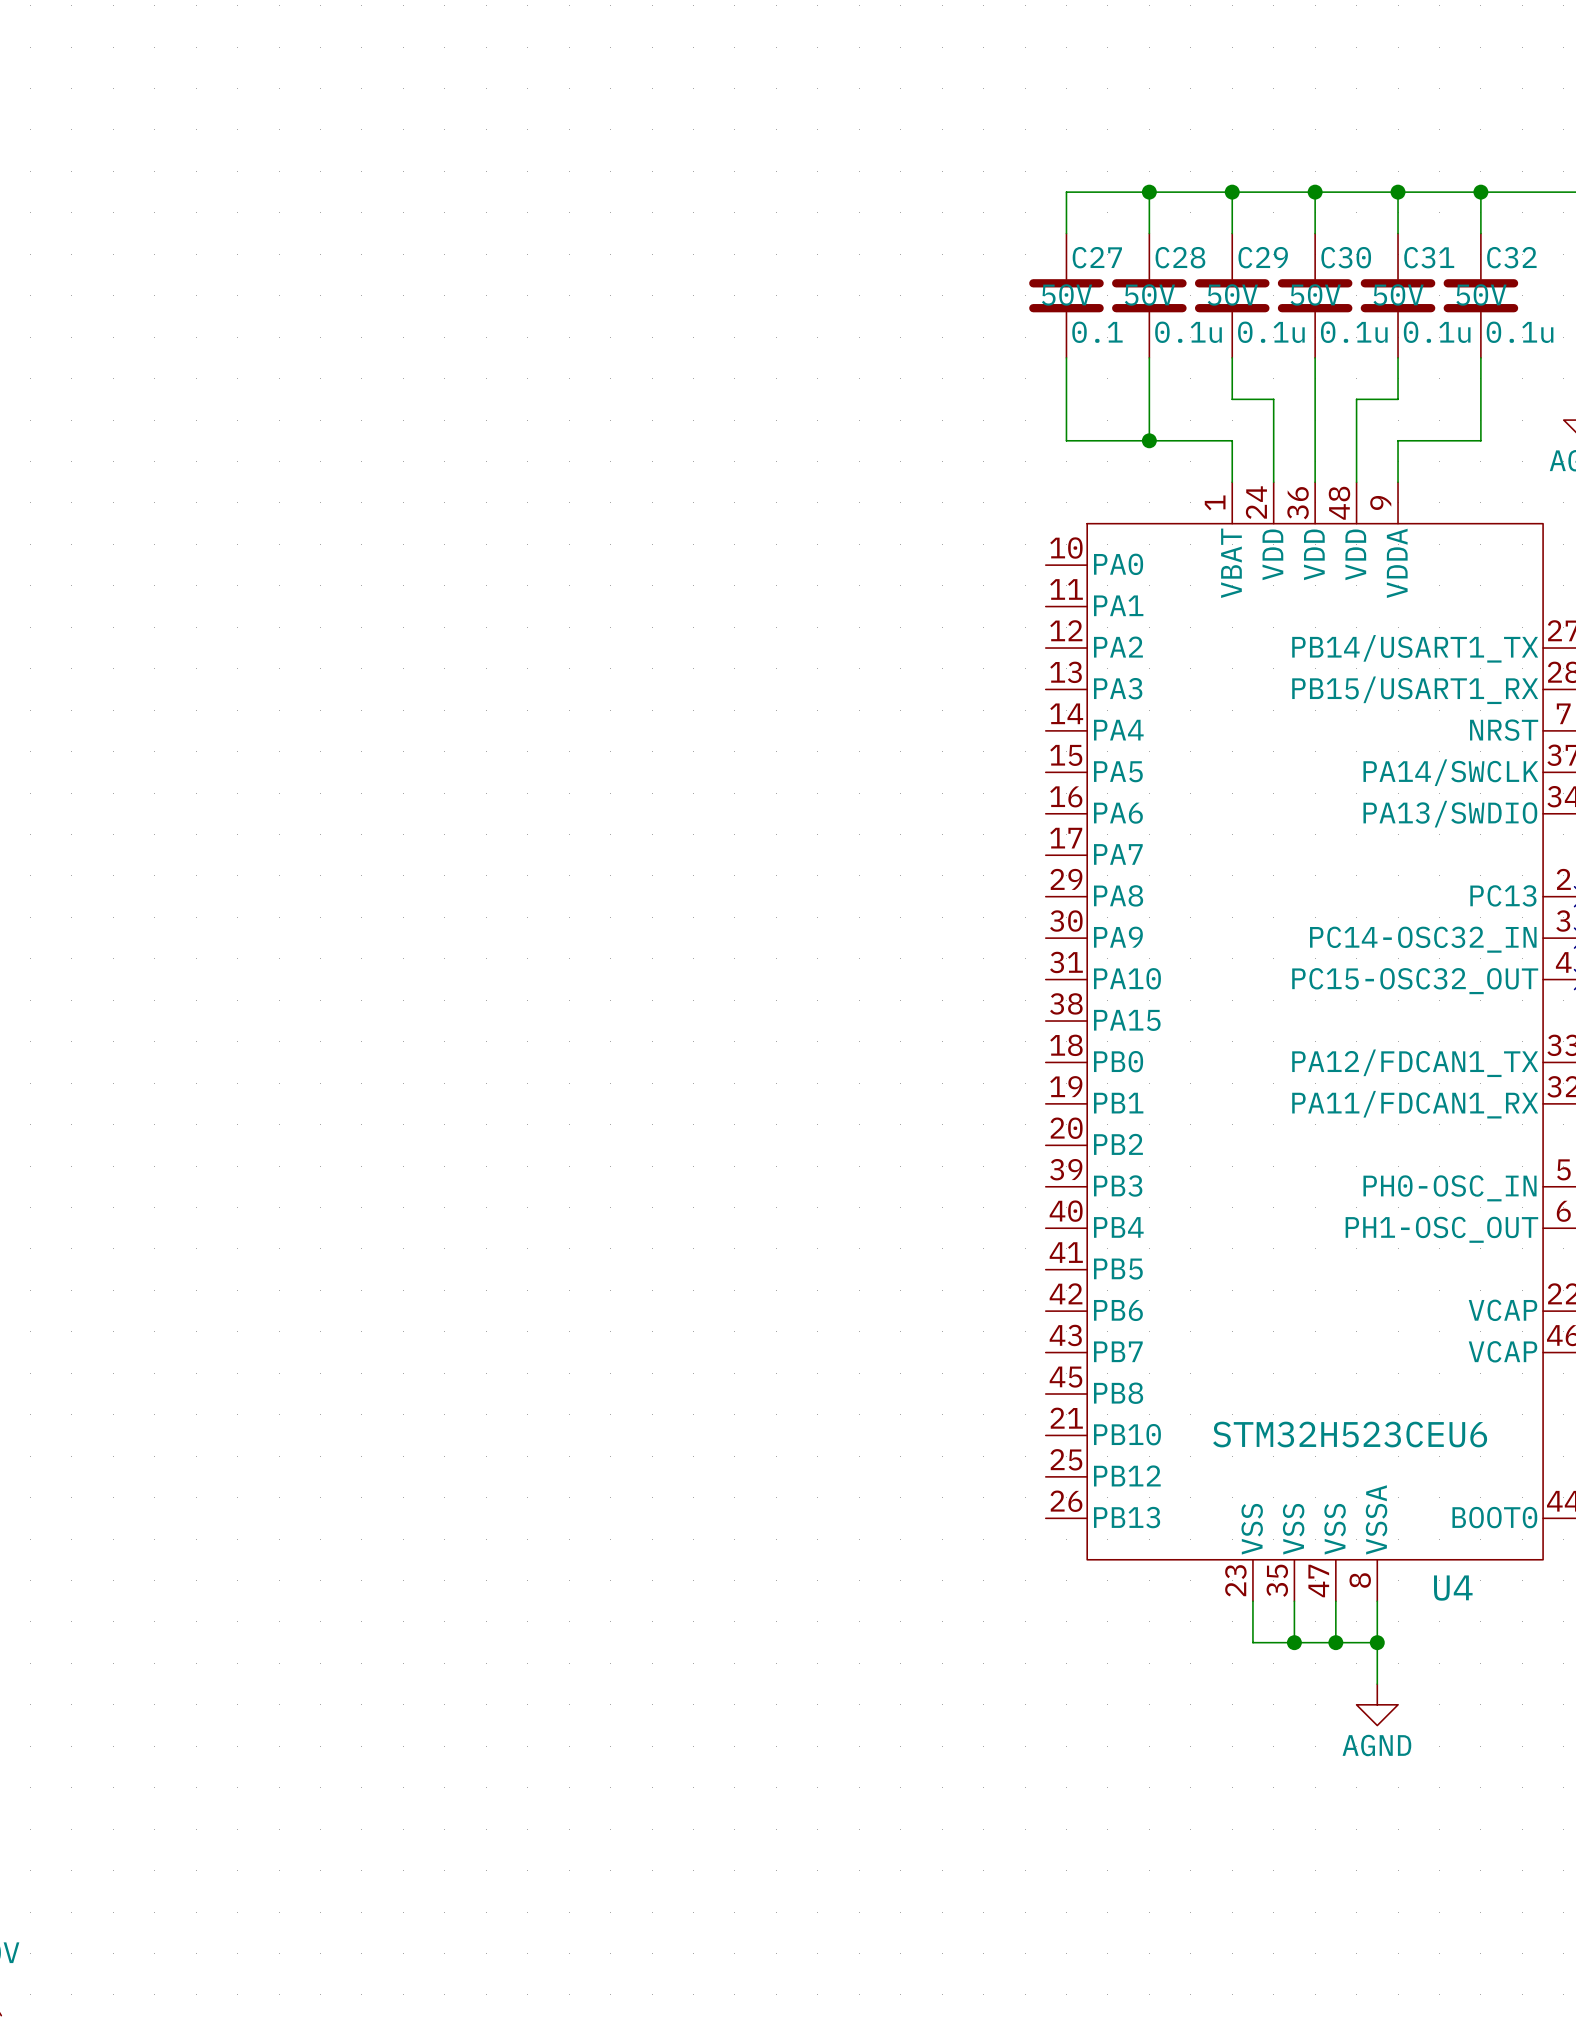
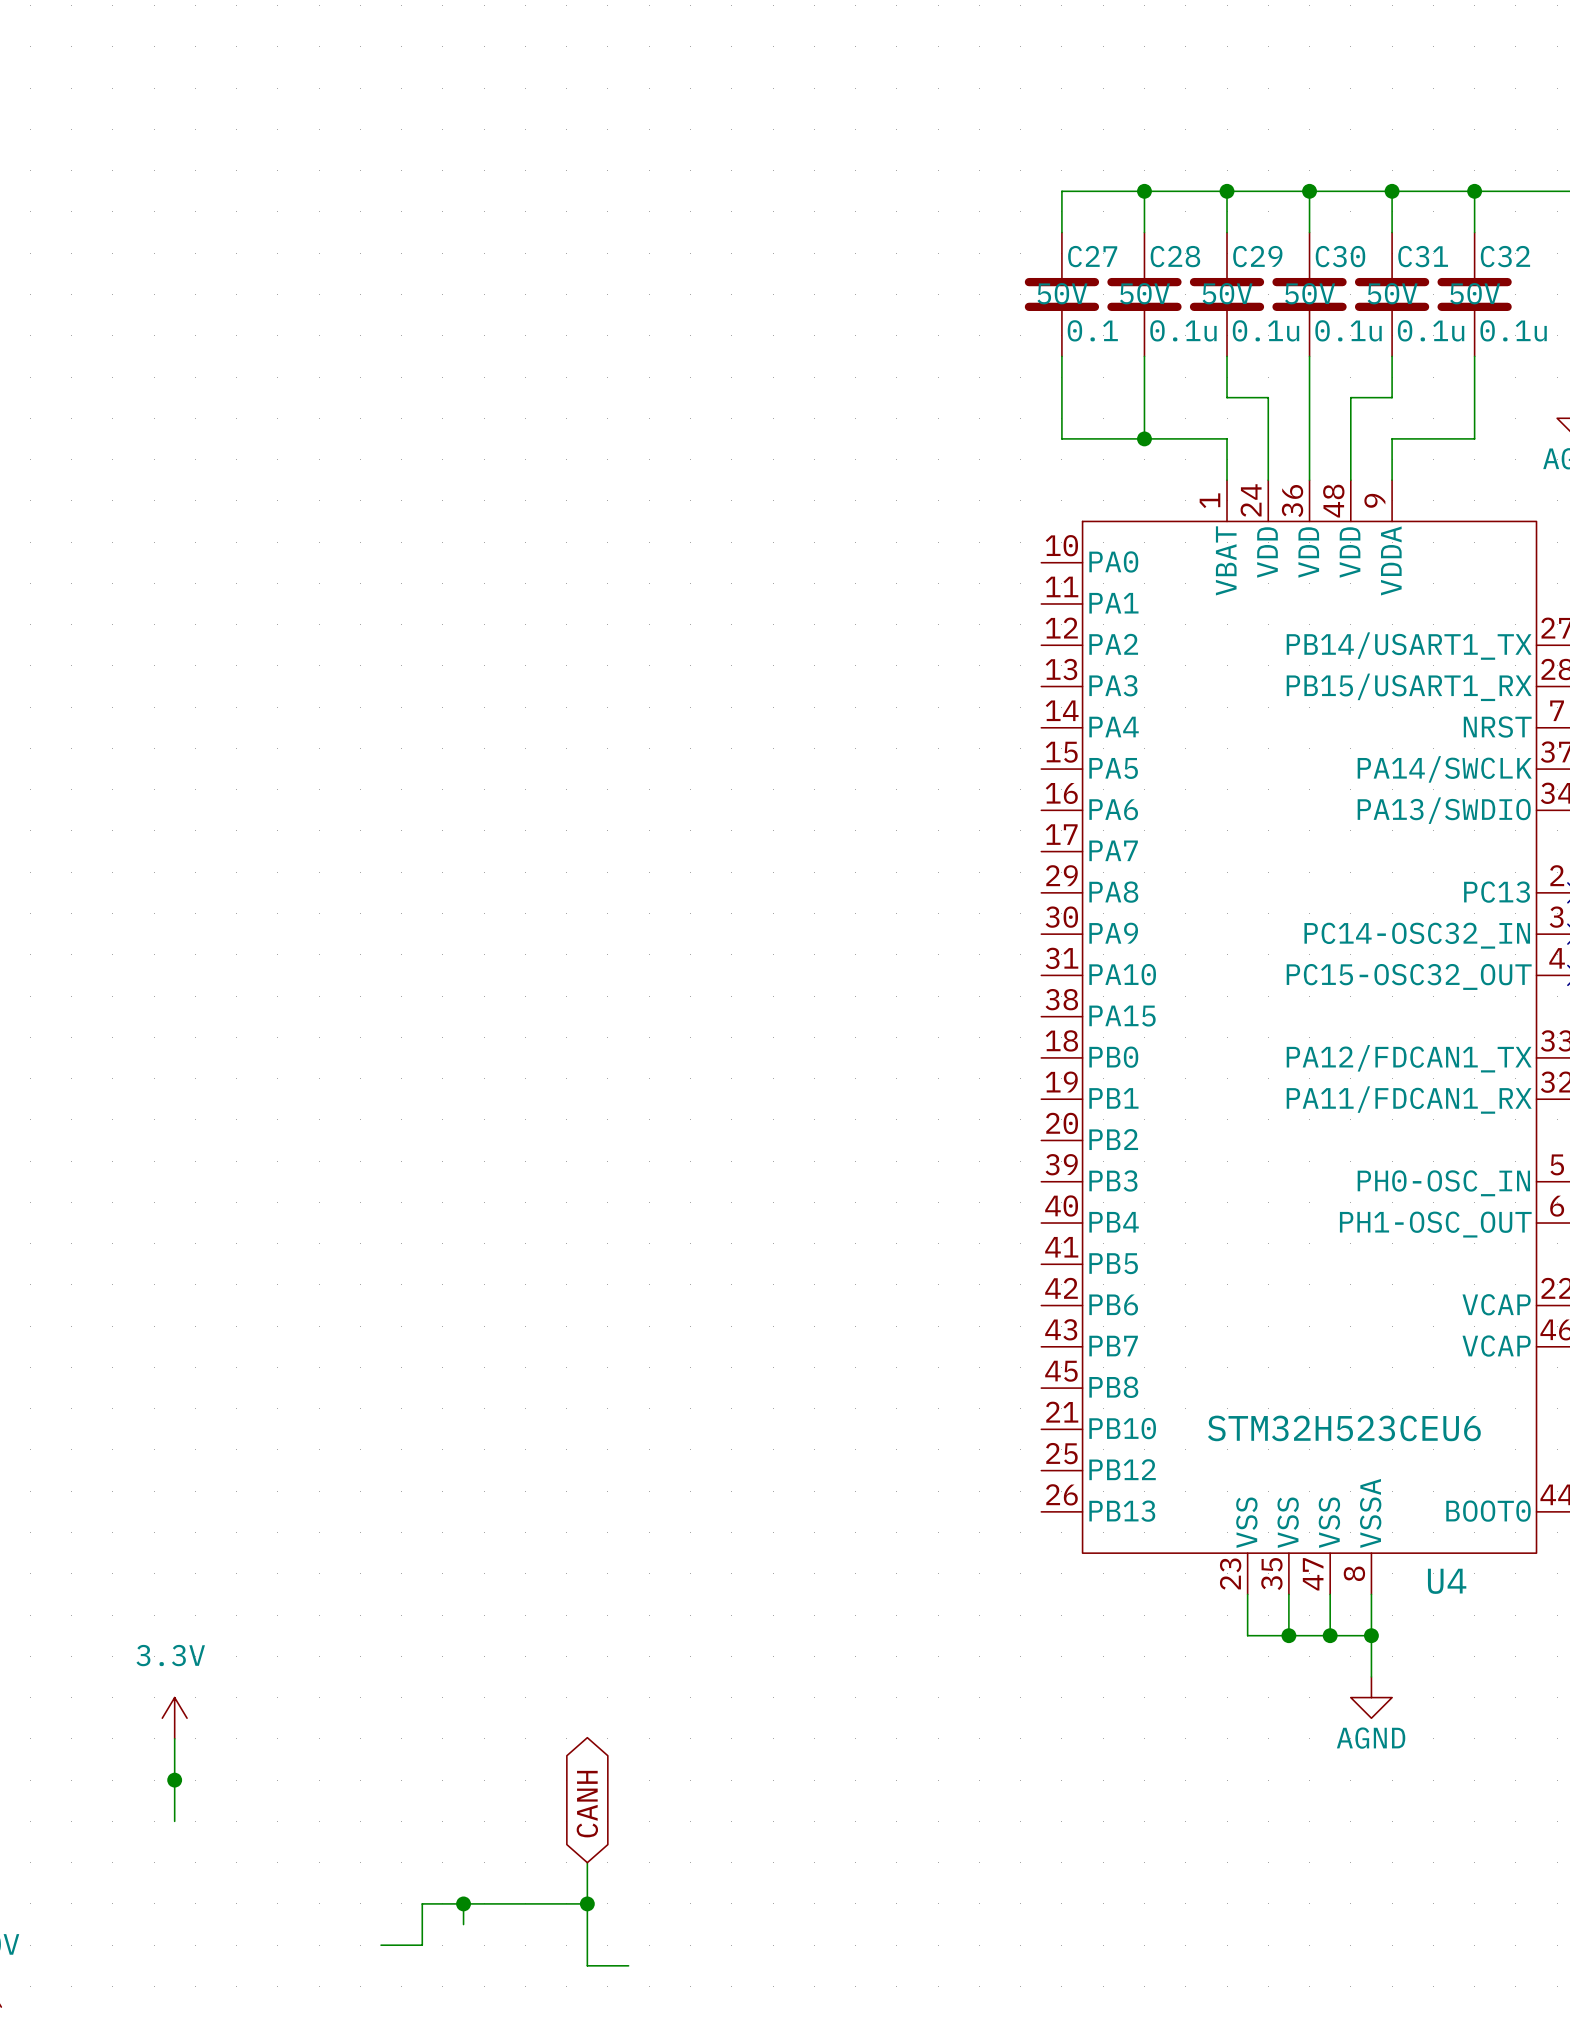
power symbol: none -> 3.3V (174, 1718)
wire: none -> (174, 1738) (174, 1821)
junction: none -> (174, 1780)
global label: none -> CANH (587, 1804)
wire: none -> (587, 1862) (587, 1965) (628, 1965)
wire: none -> (463, 1903) (463, 1924)
junction: none -> (463, 1903)
wire: none -> (587, 1903) (422, 1903) (422, 1945) (381, 1945)
junction: none -> (587, 1903)

